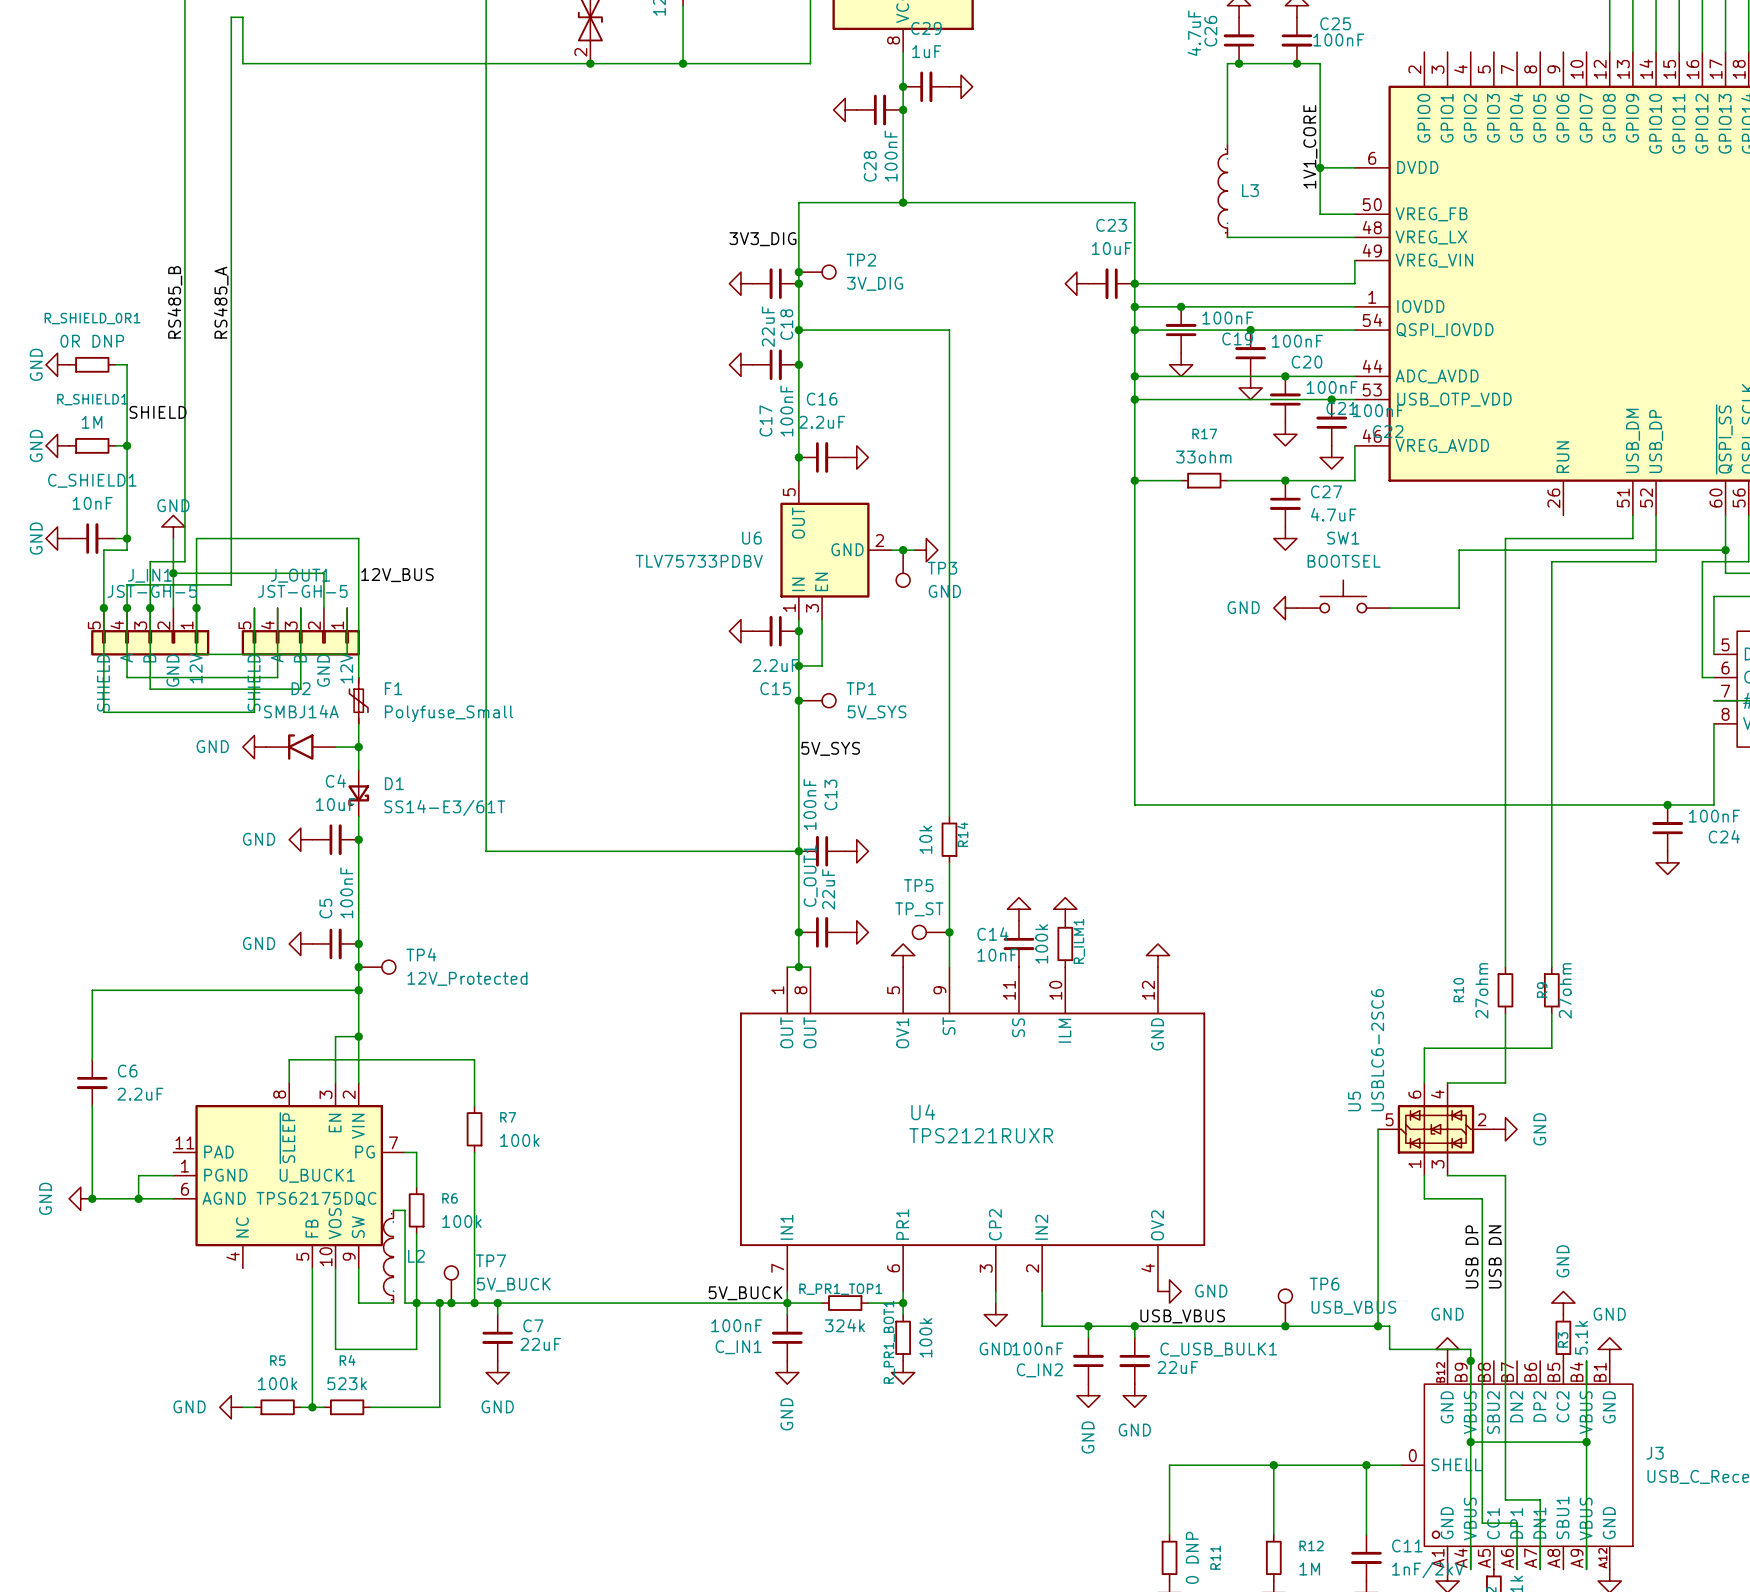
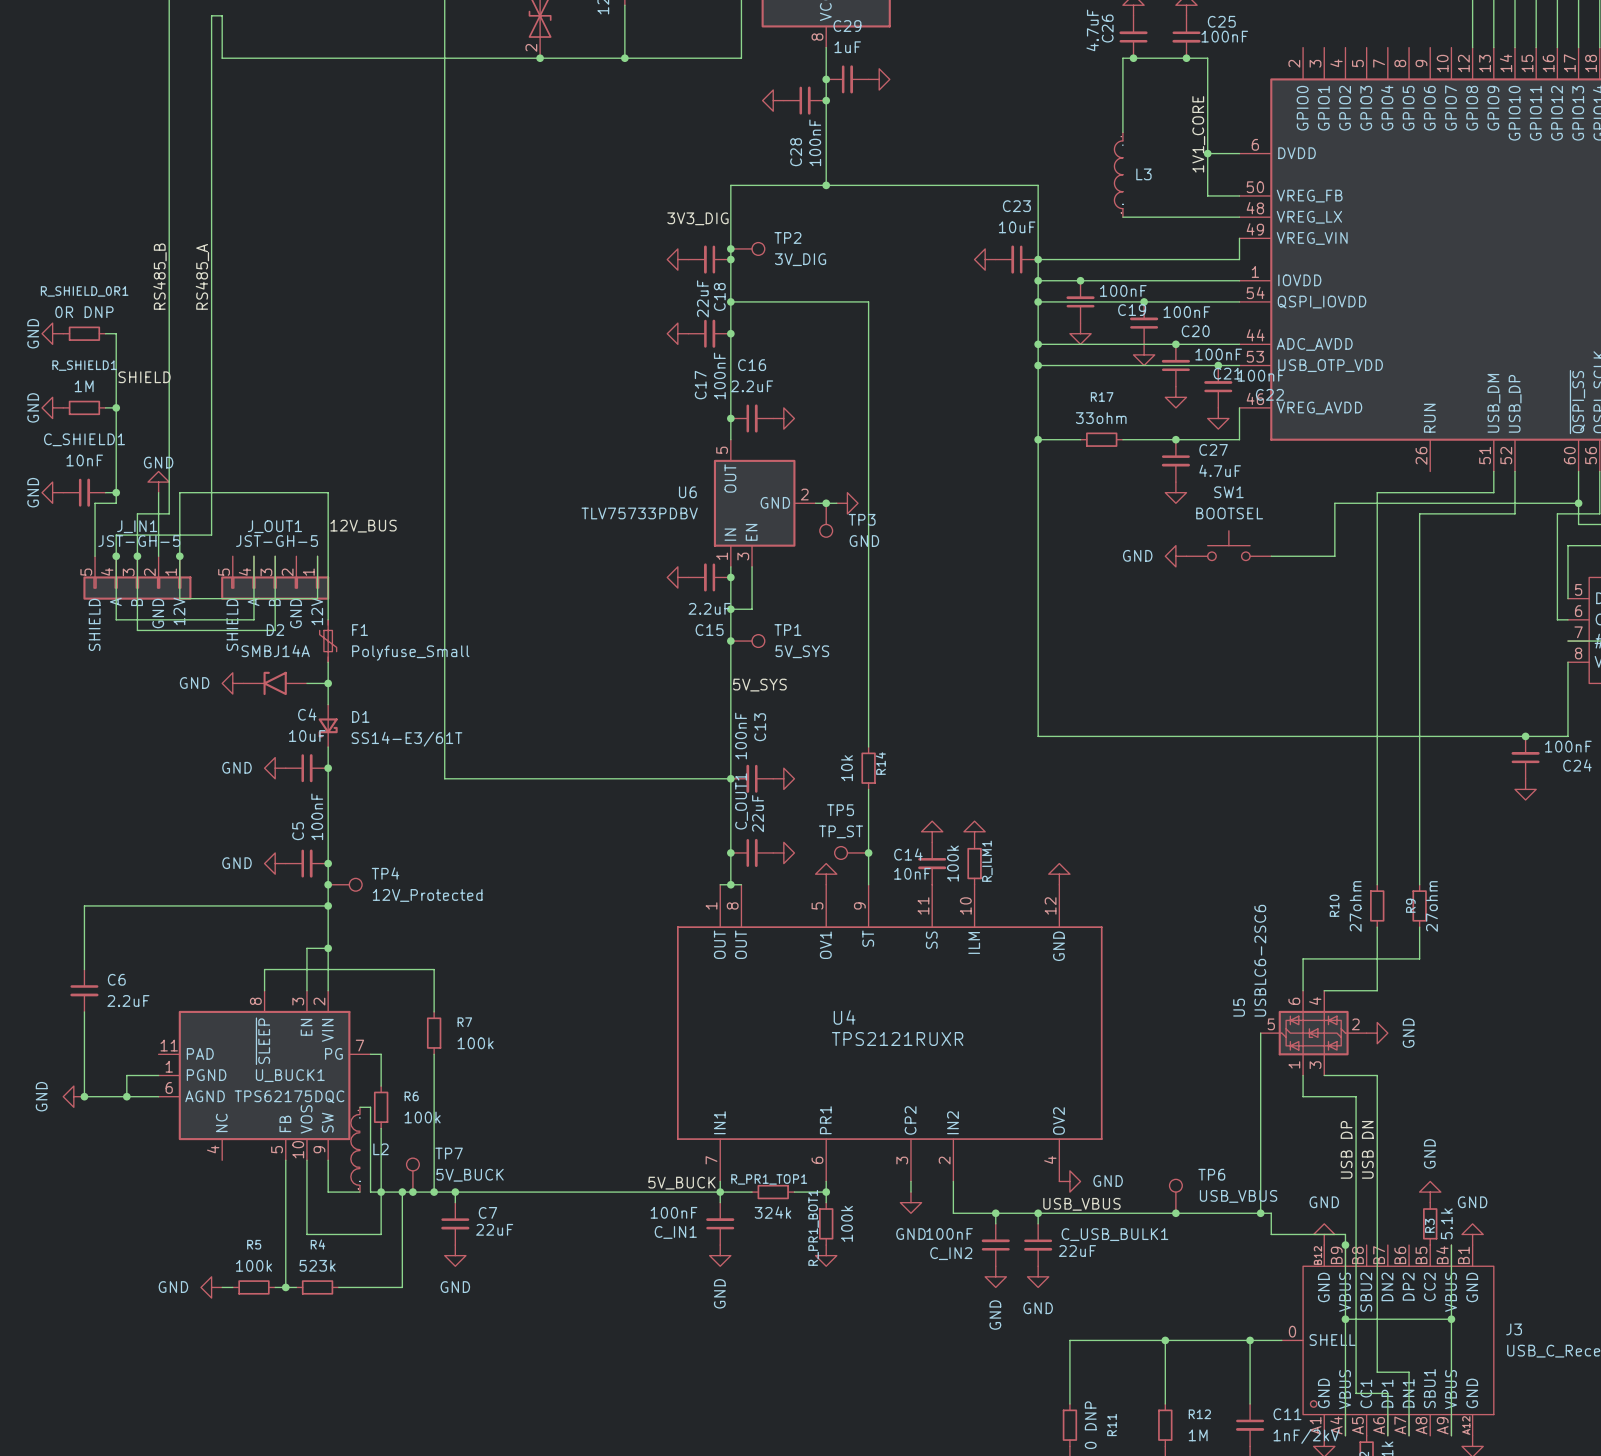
wire: (173, 573) (323, 573) (323, 608) -> none
junction: (173, 573) -> none
wire: (103, 608) (103, 712) (254, 712) (254, 608) -> none
junction: (103, 608) -> none

